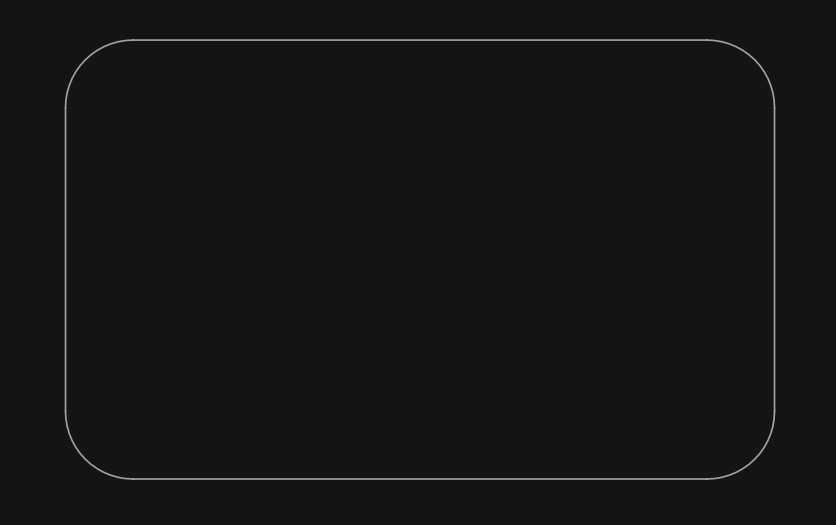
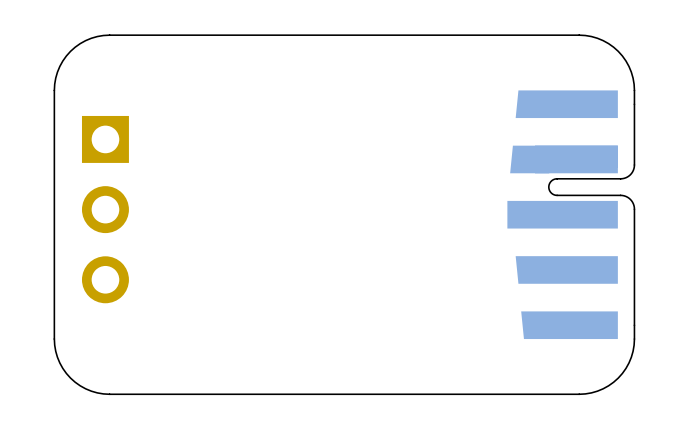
board edge: (774, 124) (774, 394) -> none
part: none -> (105, 209)
part: none -> (571, 214)

